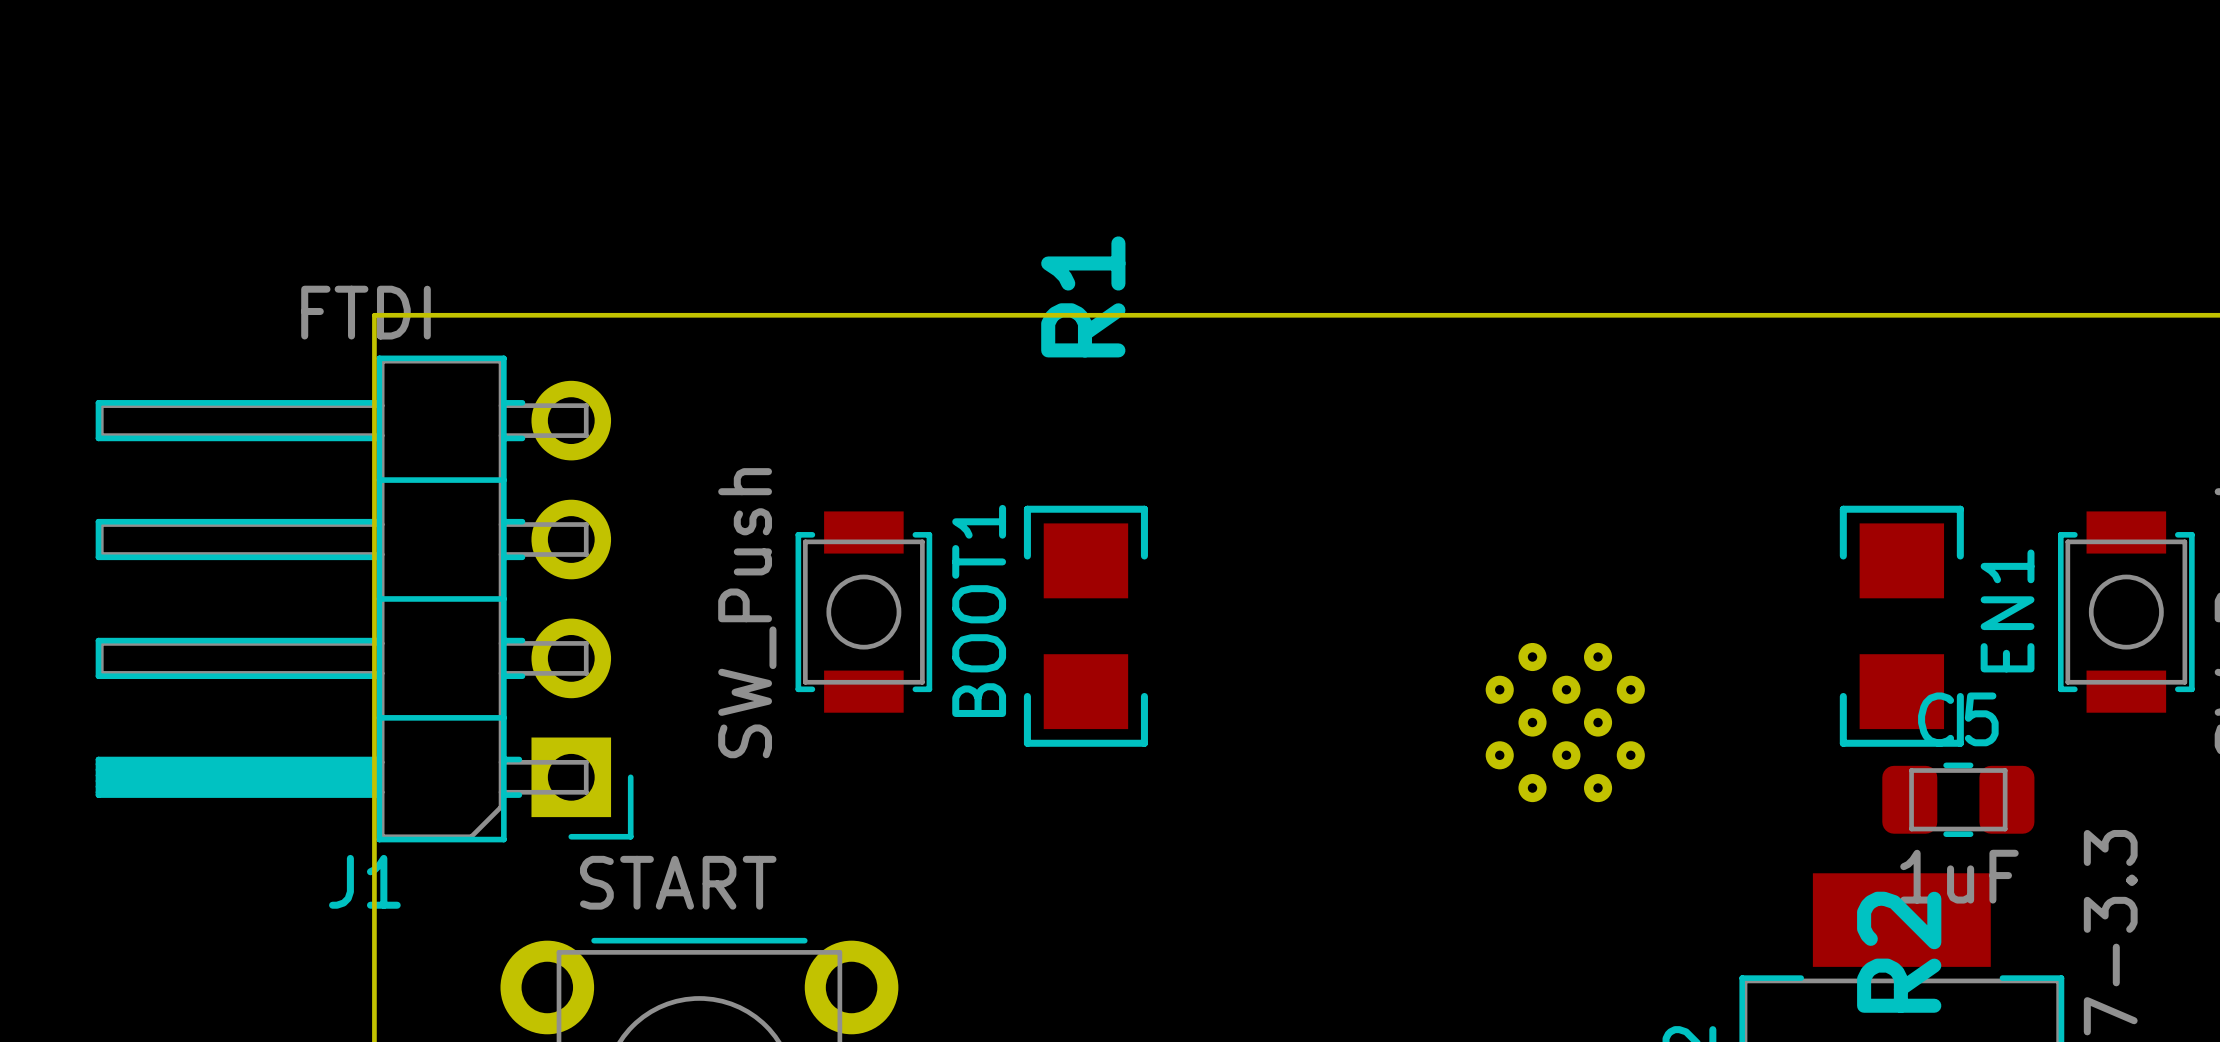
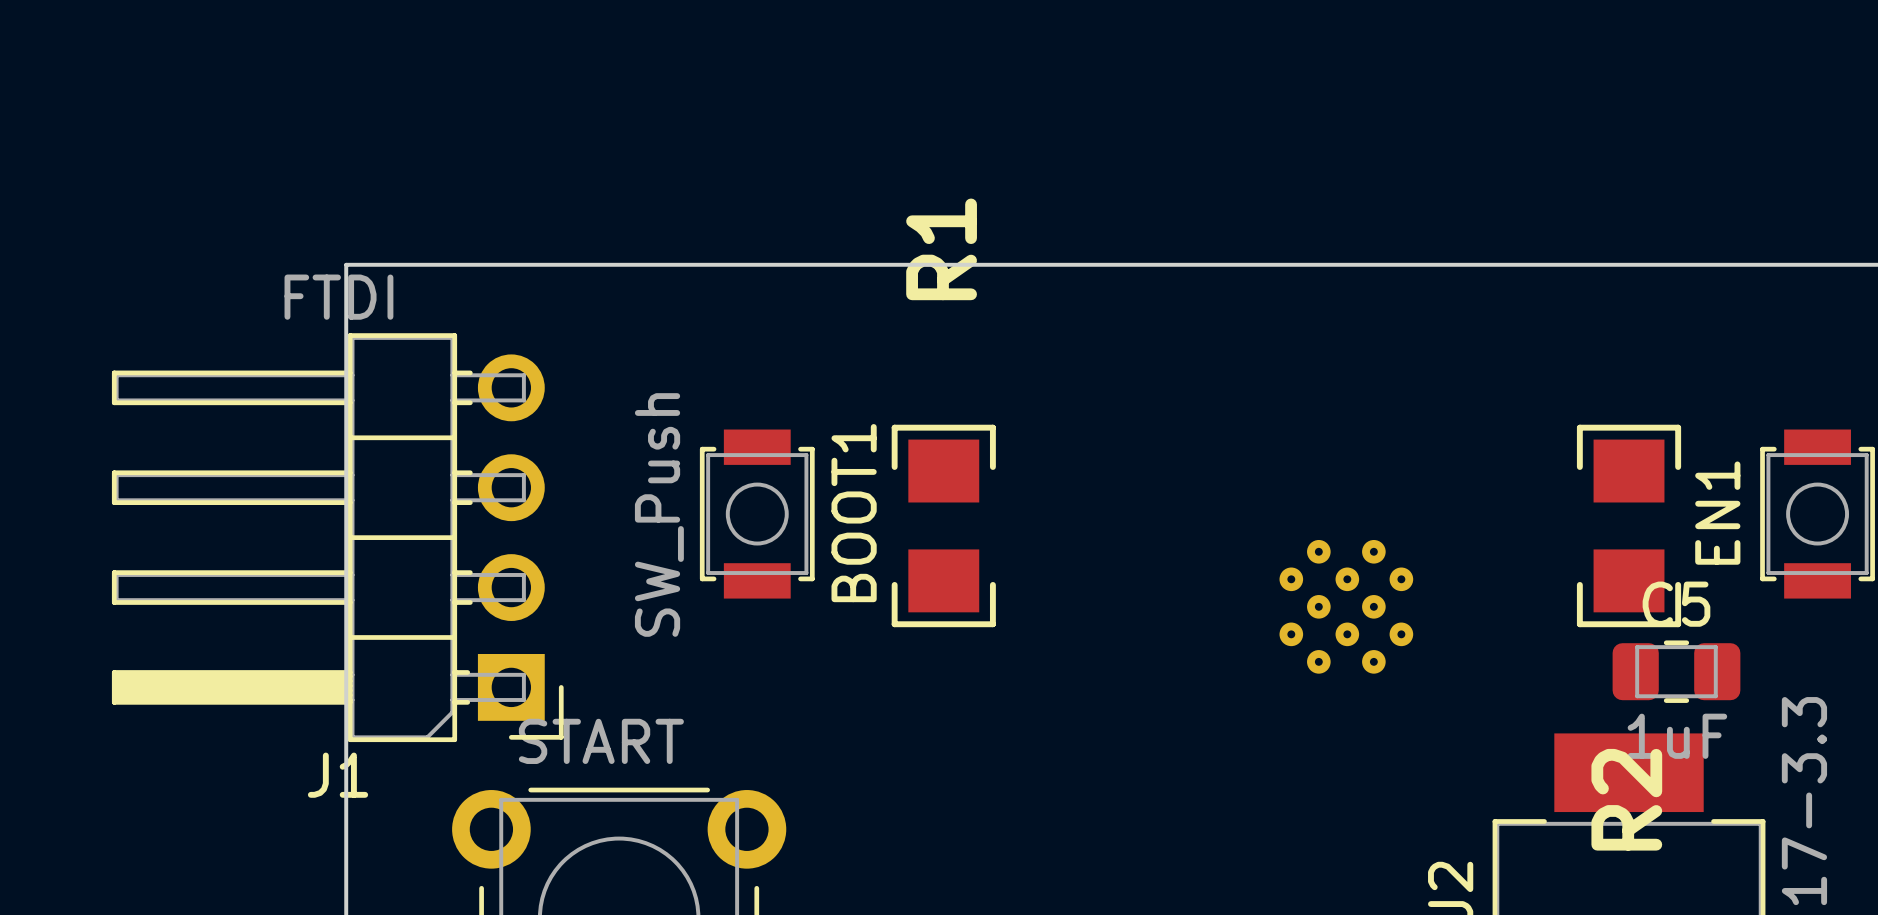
J1 position: (364, 598) -> (337, 537)

